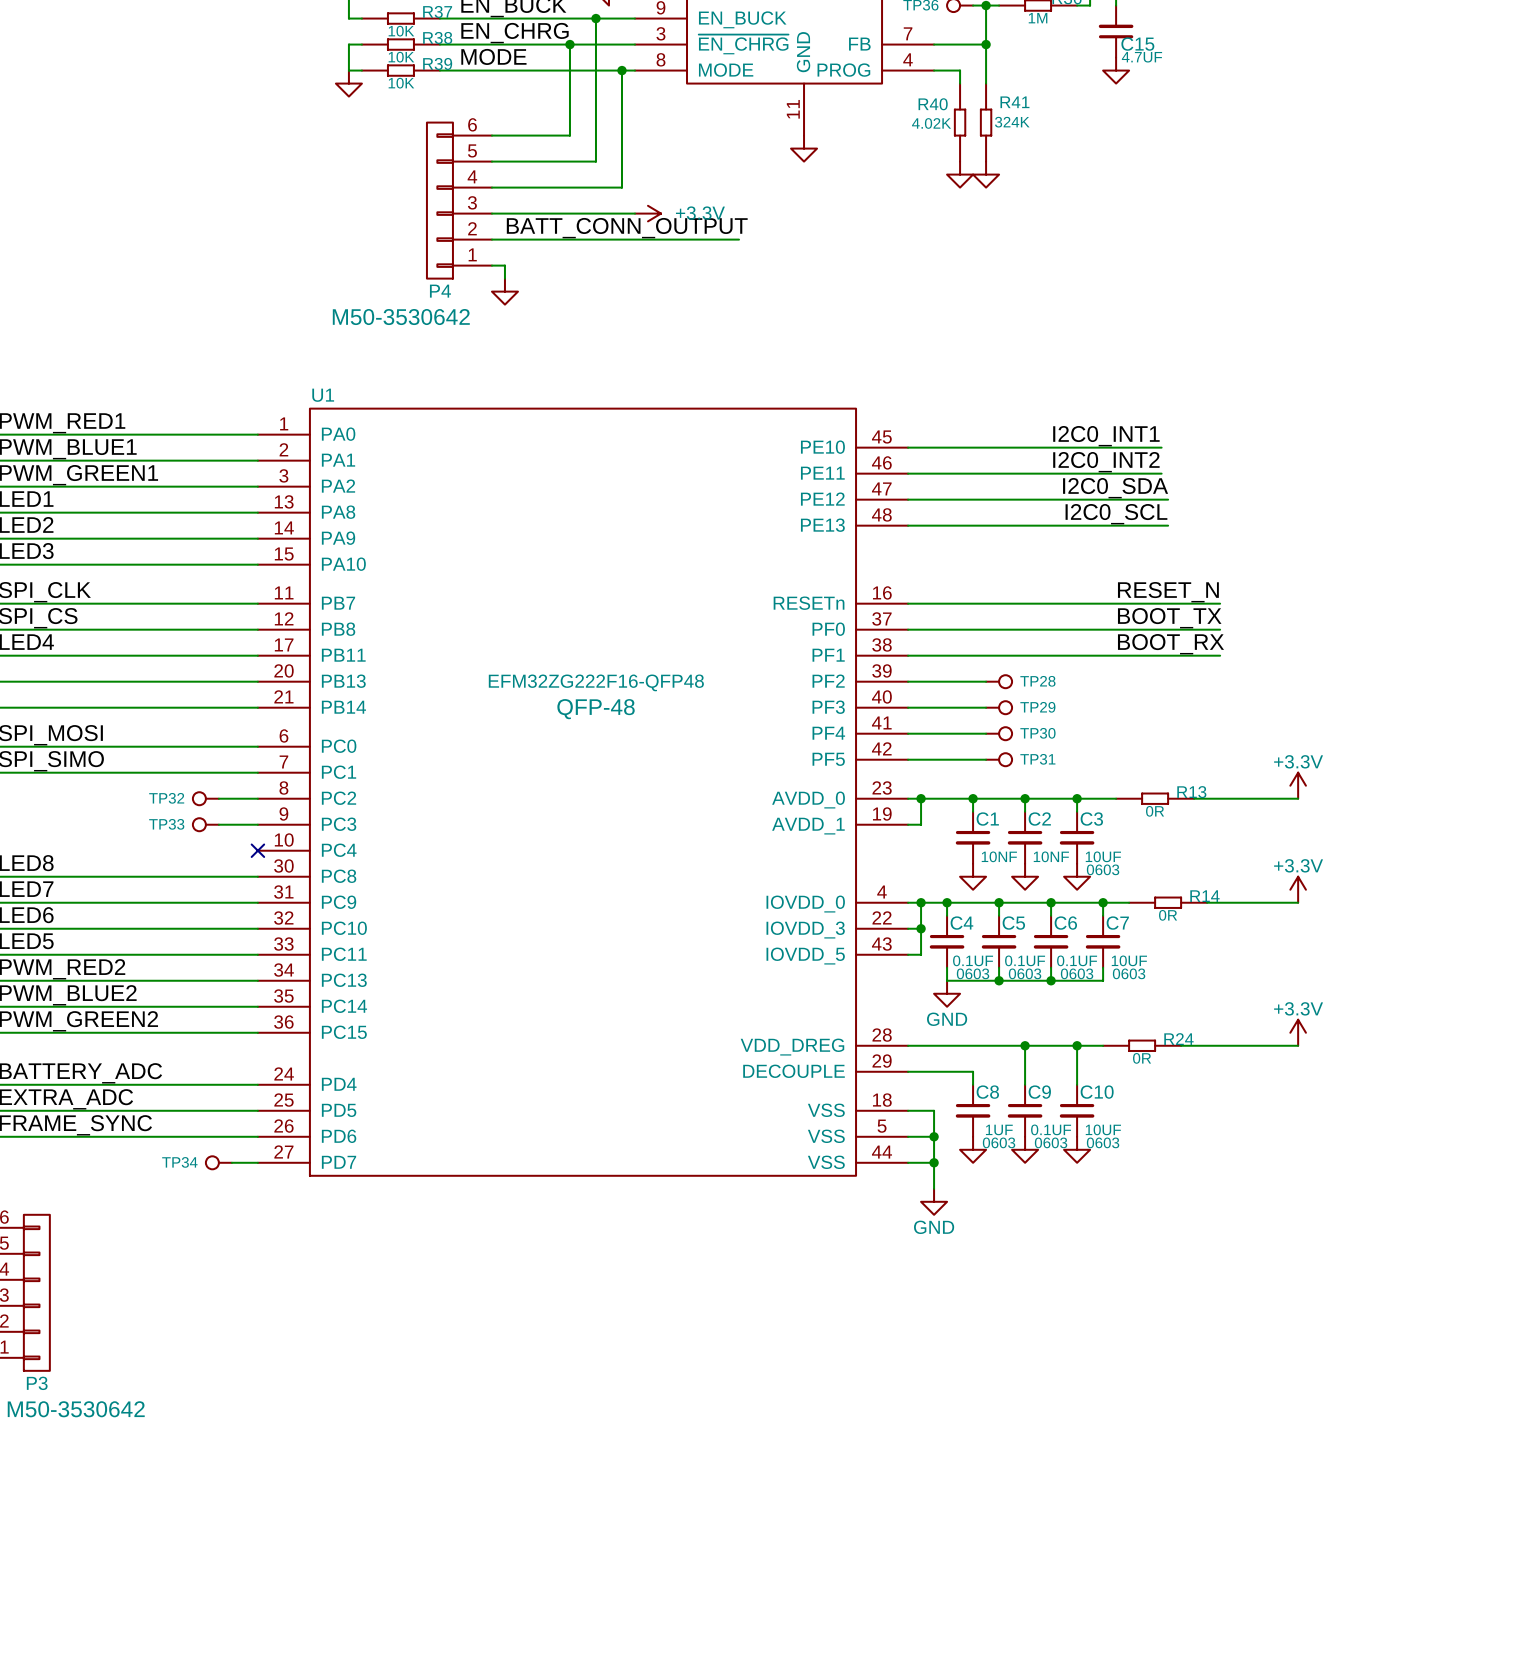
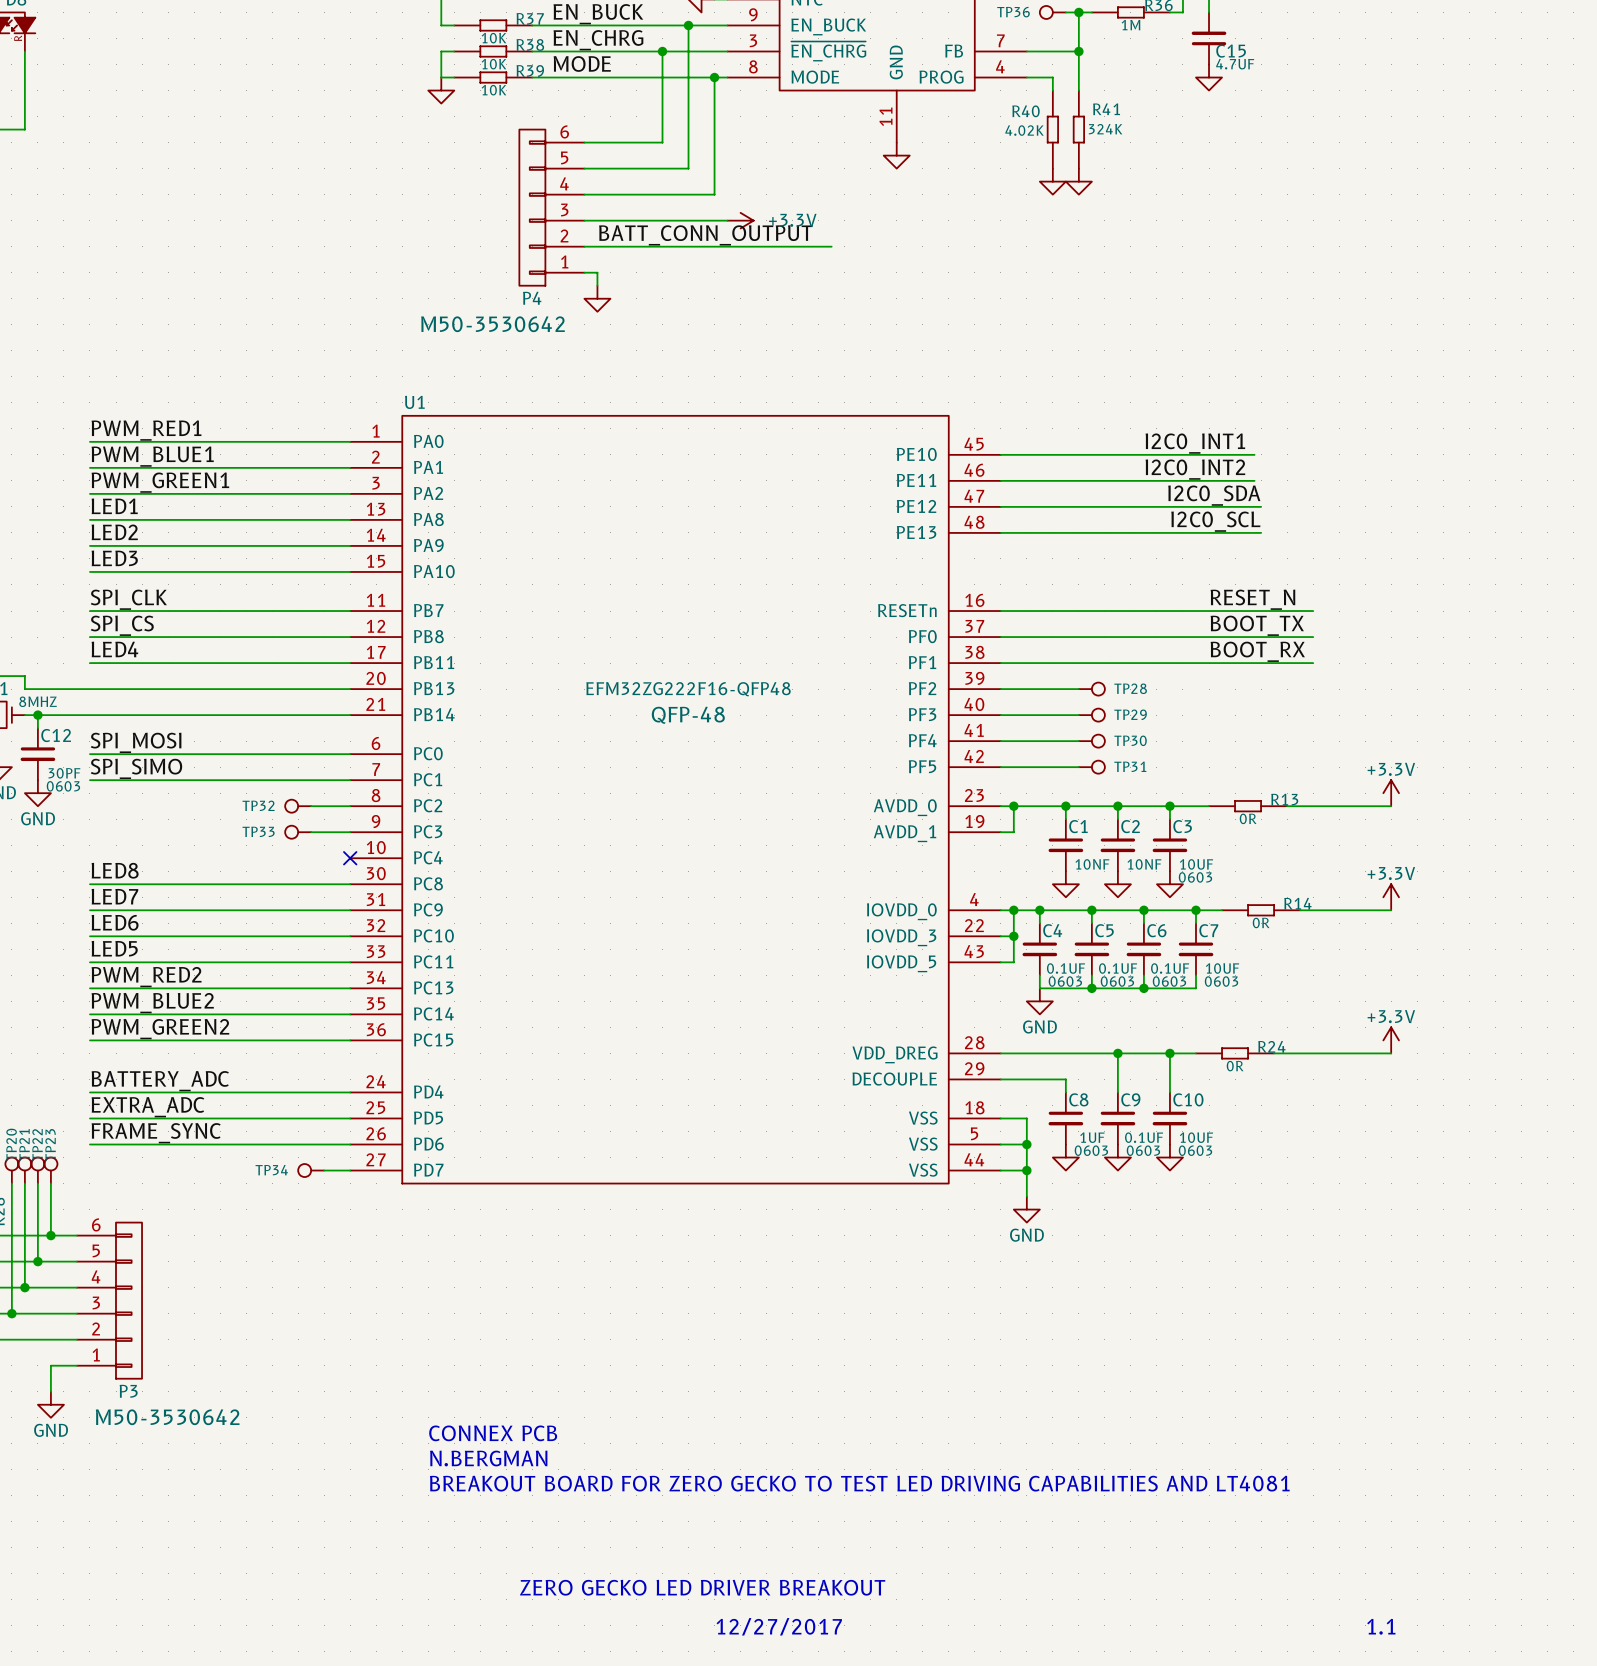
text: none -> CONNEX PCB (493, 1433)
text: none -> N.BERGMAN (488, 1458)
text: none -> BREAKOUT BOARD FOR ZERO GECKO TO TEST LED DRIVING CAPABILITIES AND LT4081 (859, 1483)
text: none -> ZERO GECKO LED DRIVER BREAKOUT (702, 1587)
text: none -> 12/27/2017 (779, 1626)
text: none -> 1.1 (1381, 1626)

